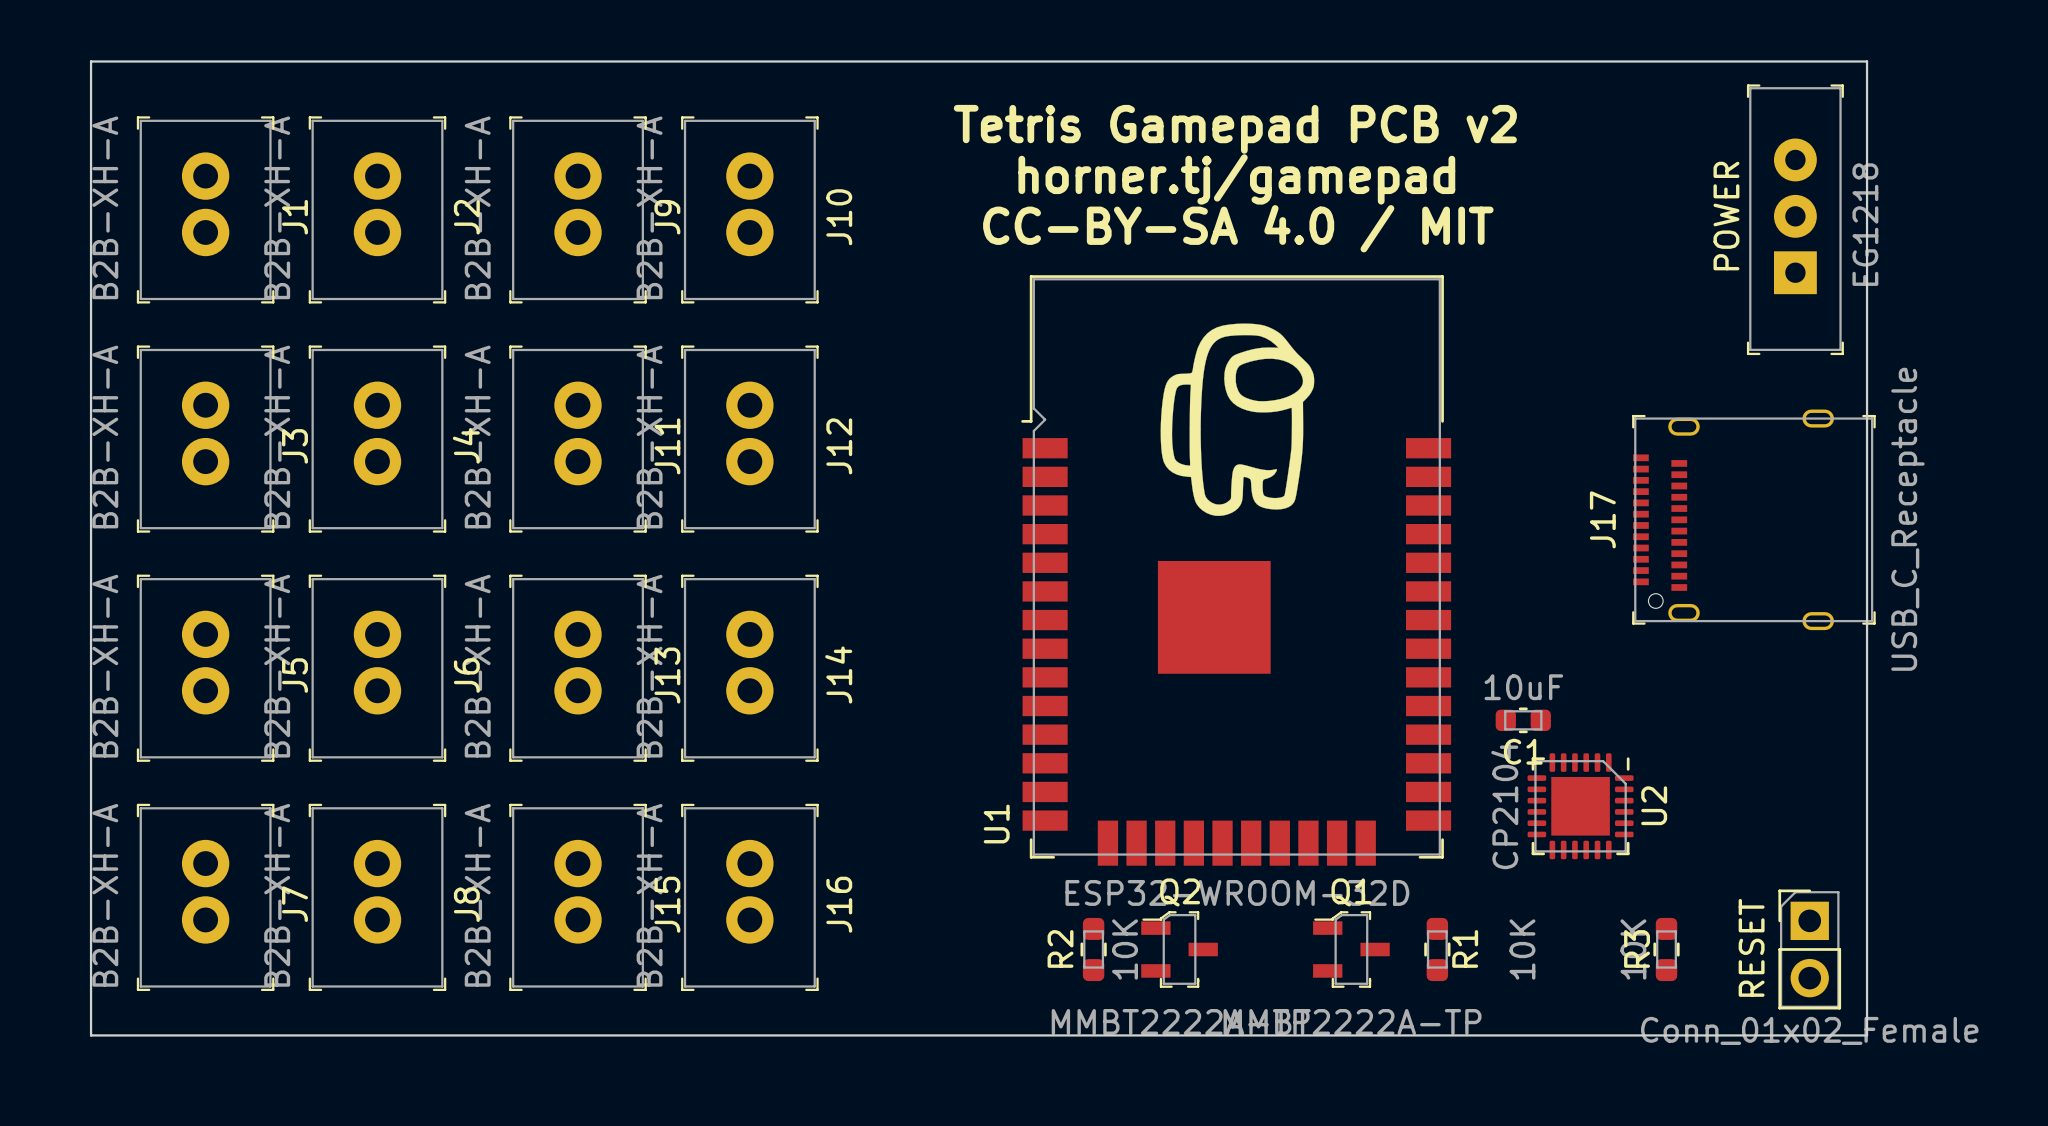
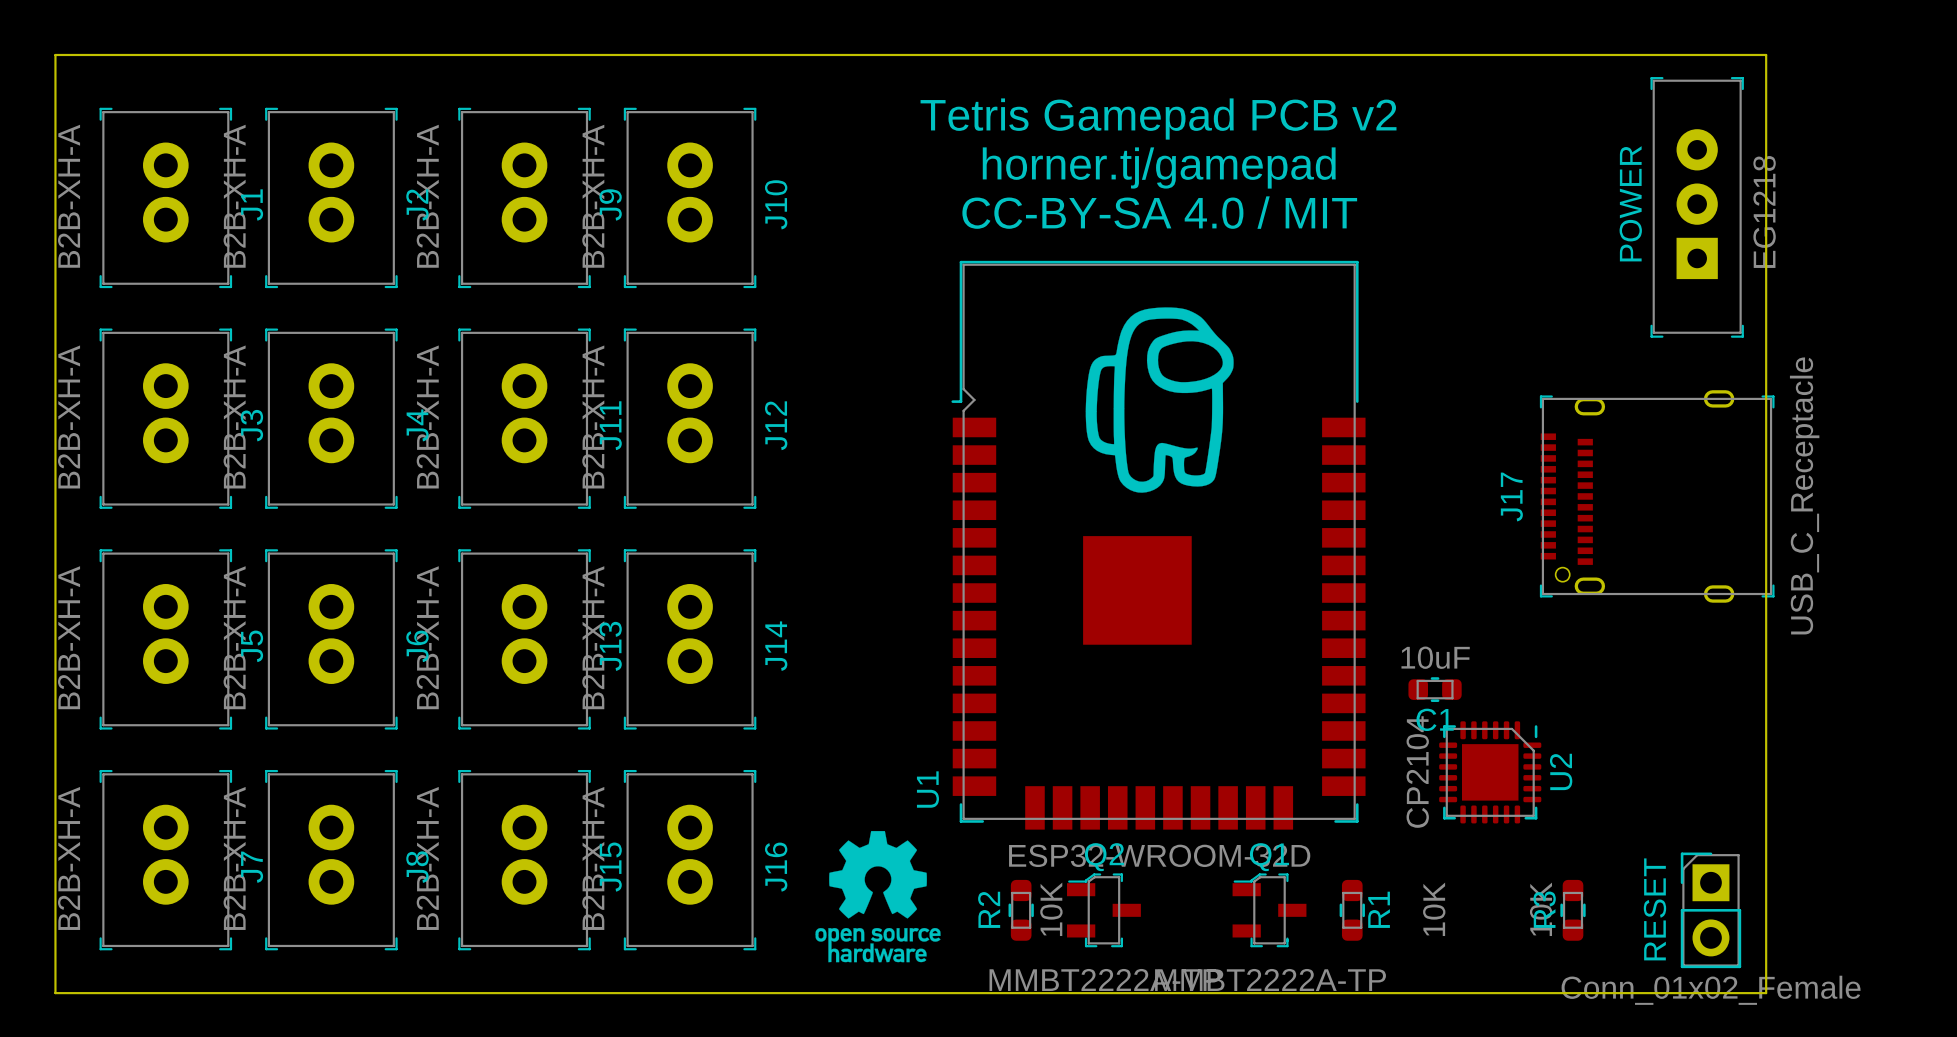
drawing: none -> [815, 831, 941, 963]

